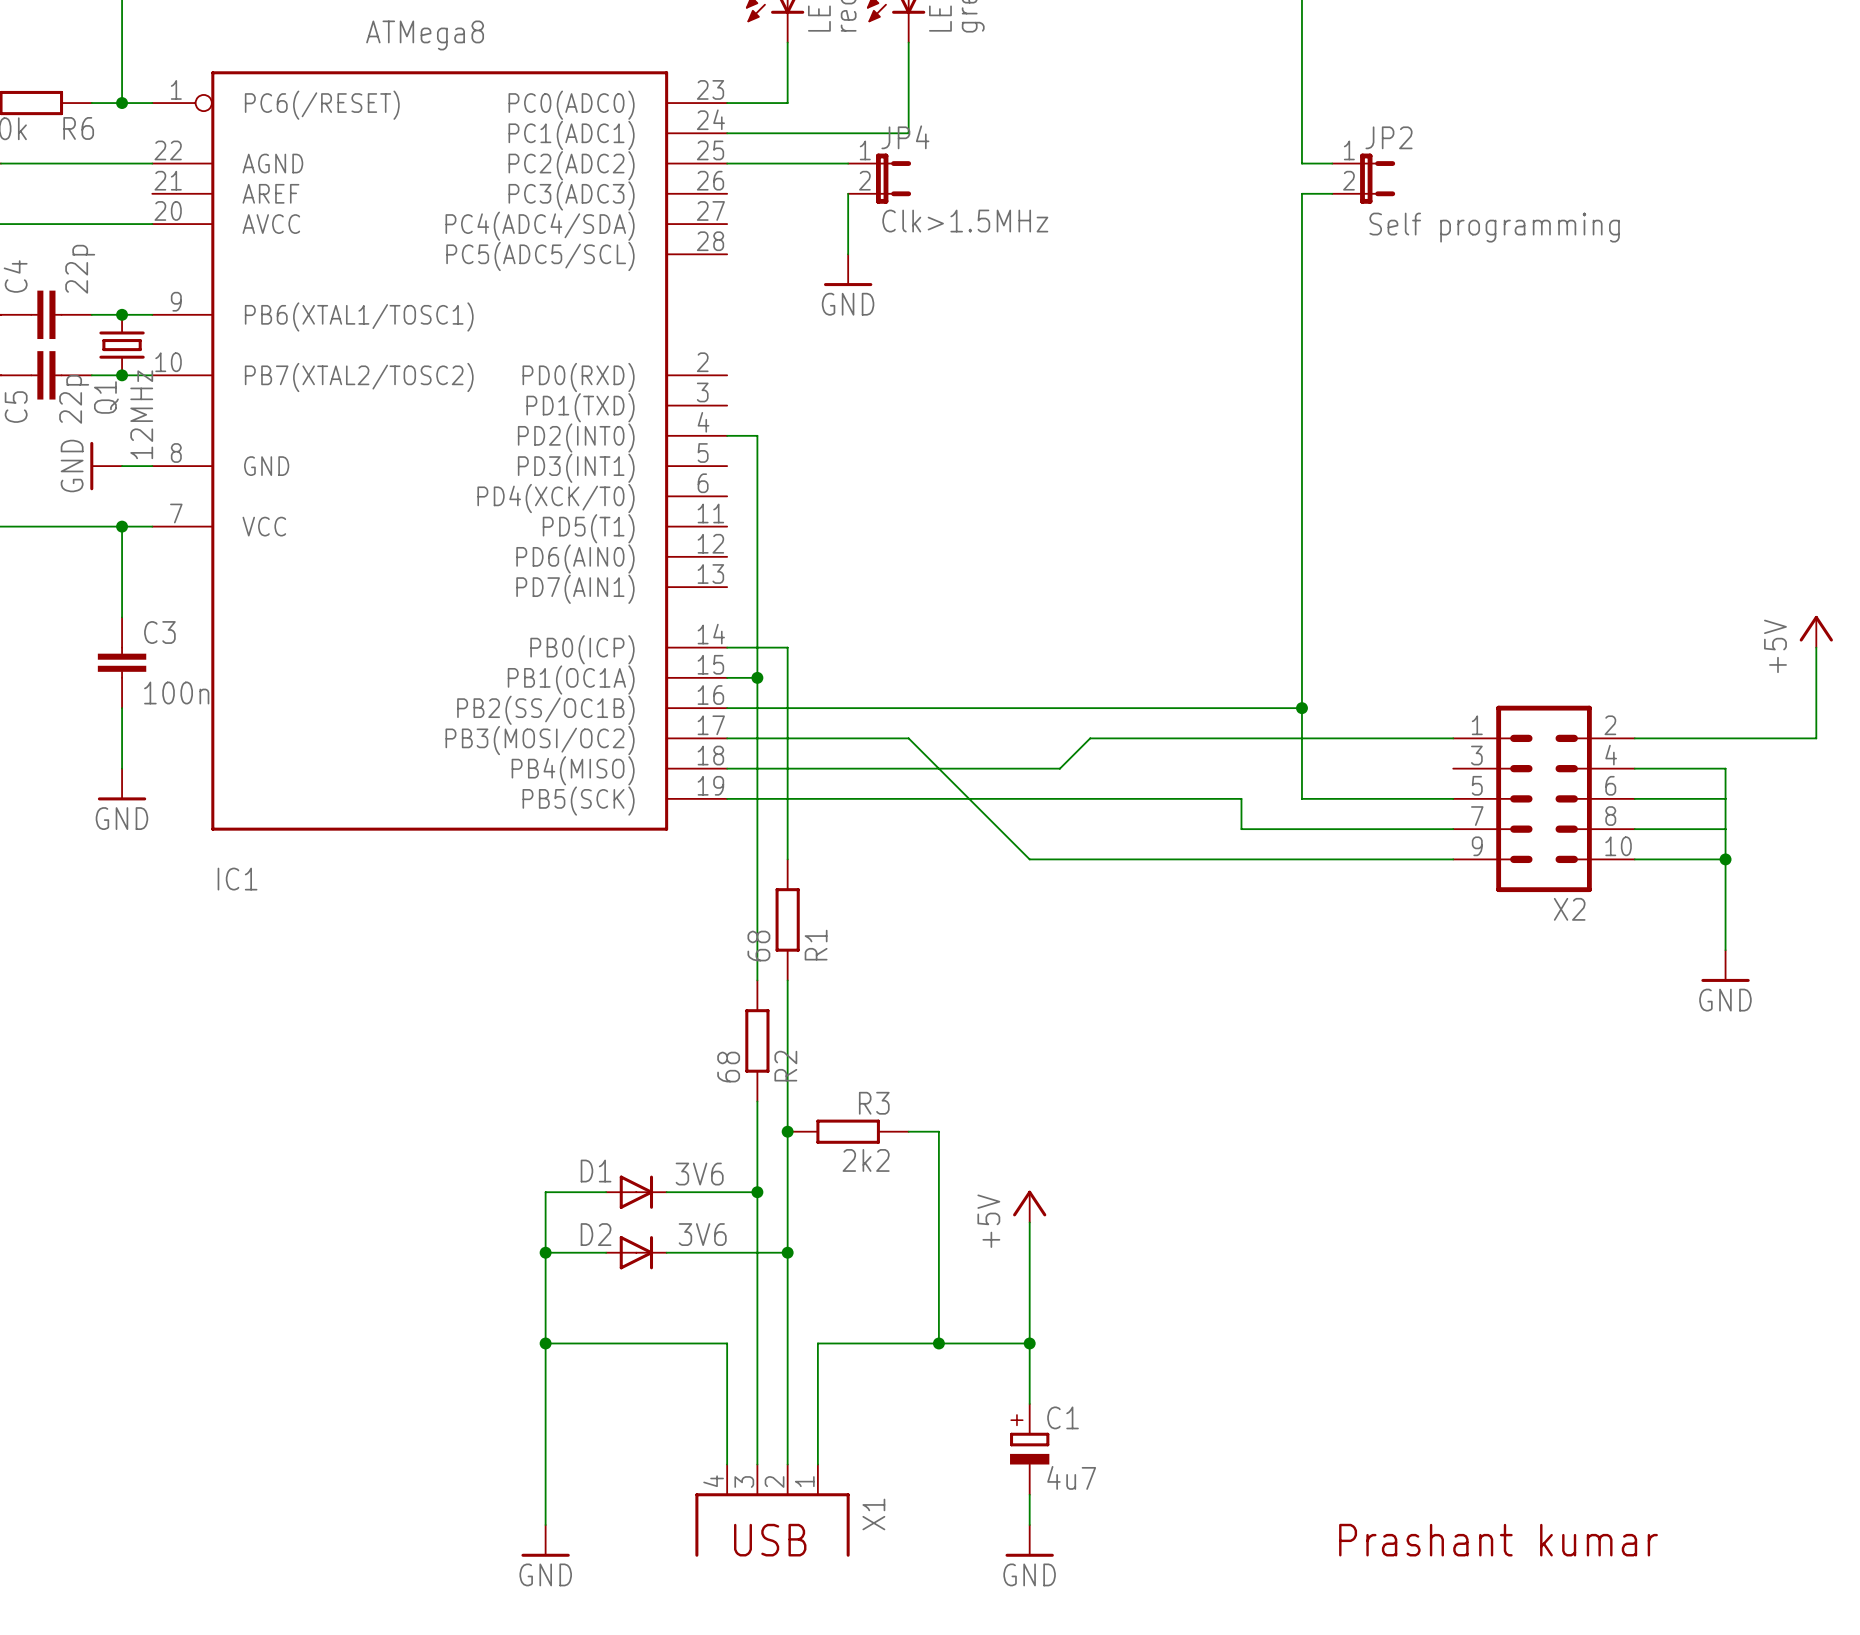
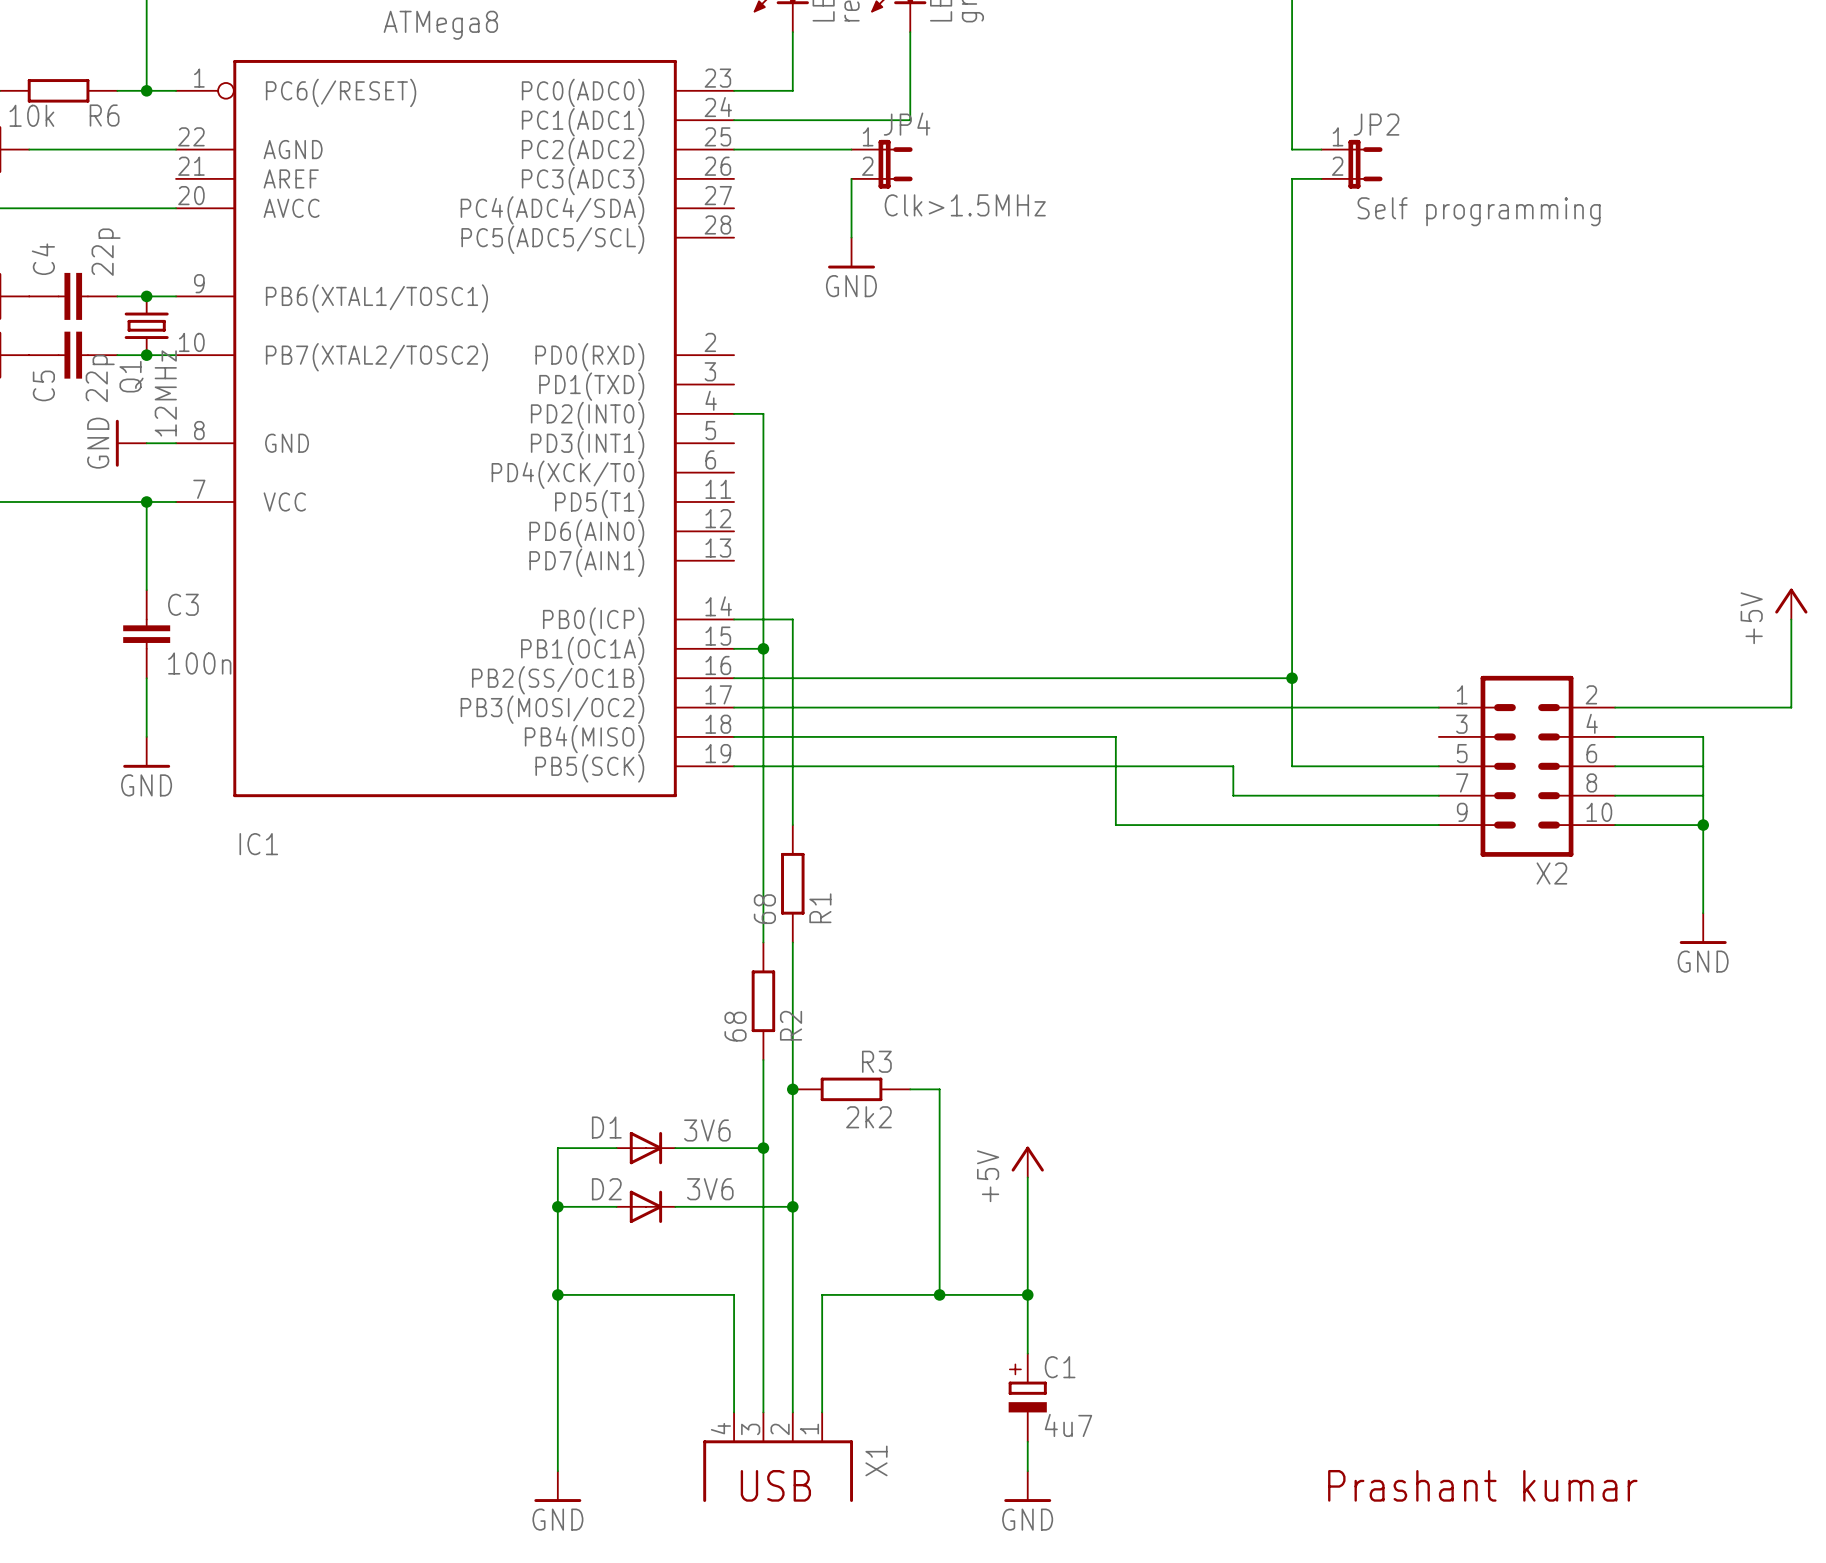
wire: (908, 738) (1029, 859) (1120, 859) -> (910, 707) (1086, 707)
wire: (1090, 738) (1059, 768) -> (1115, 825) (1115, 736) (1057, 736)

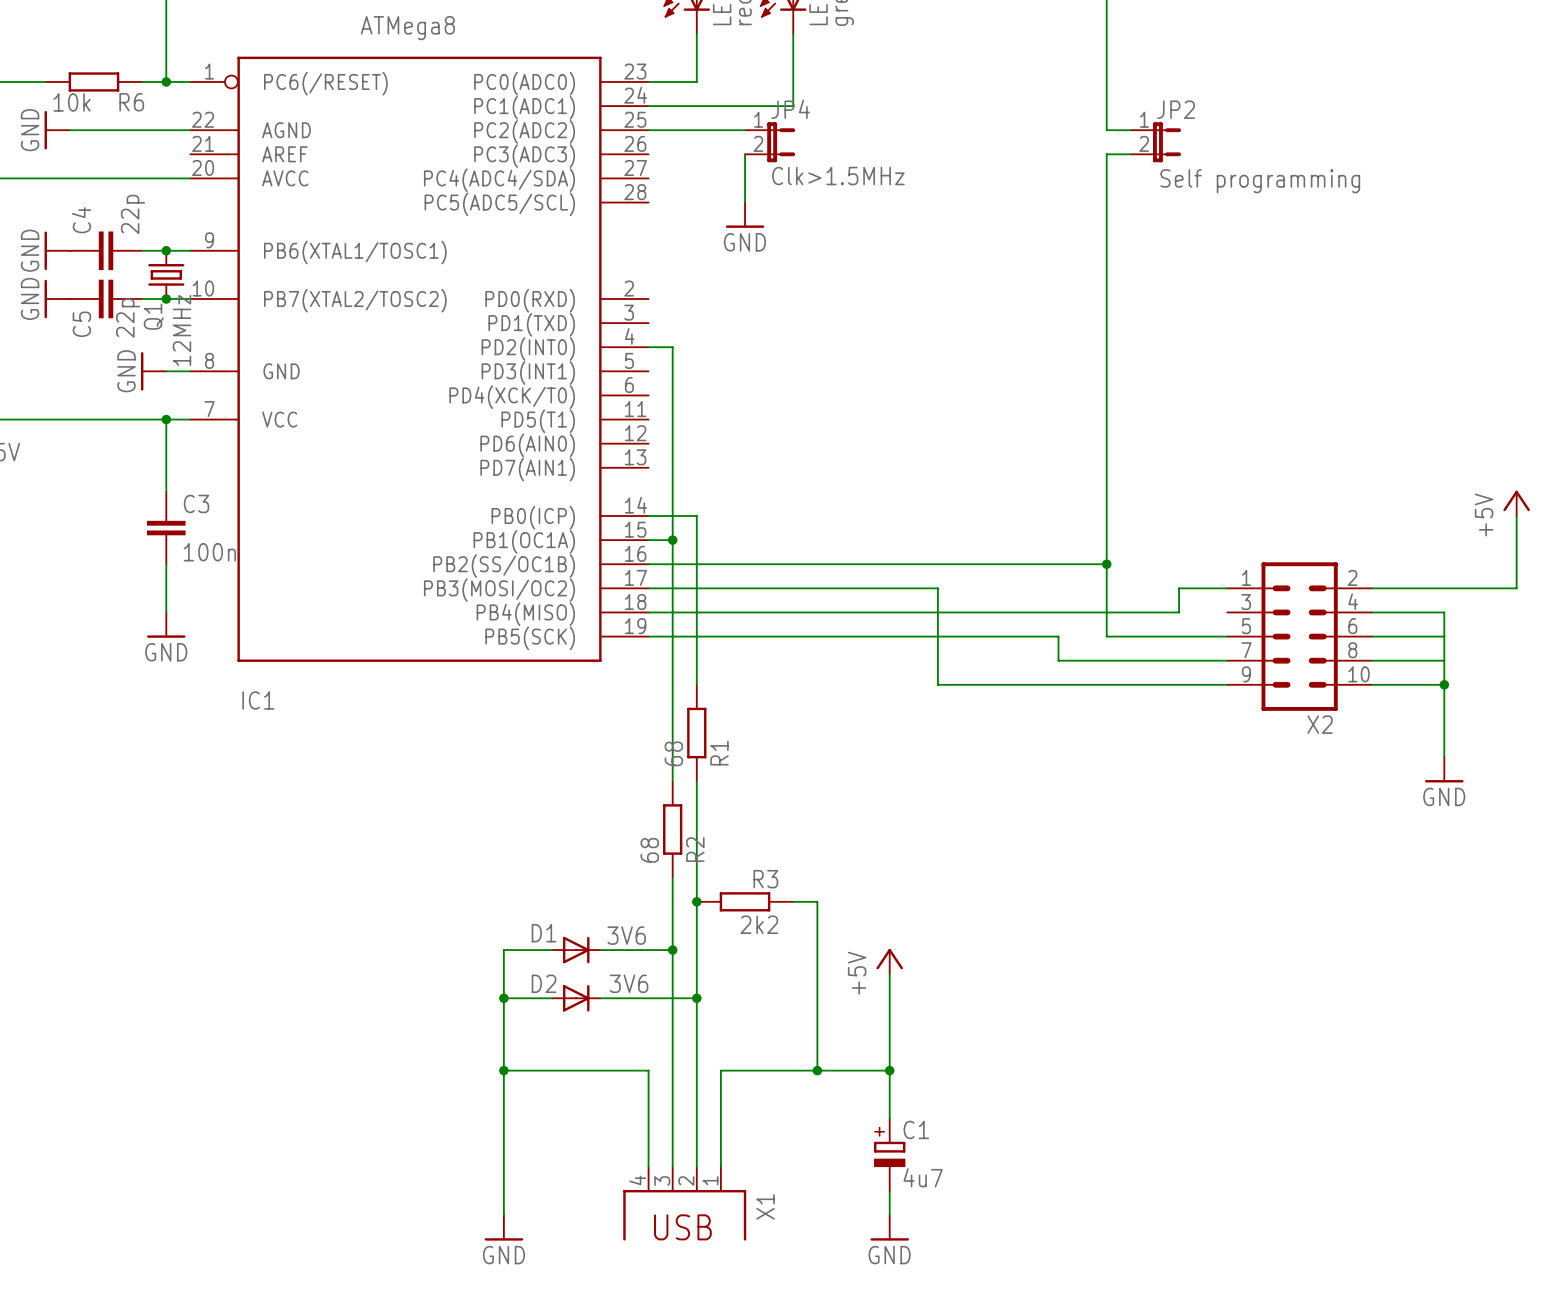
wire: (1086, 707) (1380, 707) -> (962, 612) (1179, 612) (1179, 588)
wire: (1115, 736) (1115, 825) -> (937, 588) (937, 684) (962, 684)
text: Prashant kumar (1482, 1485) -> none

